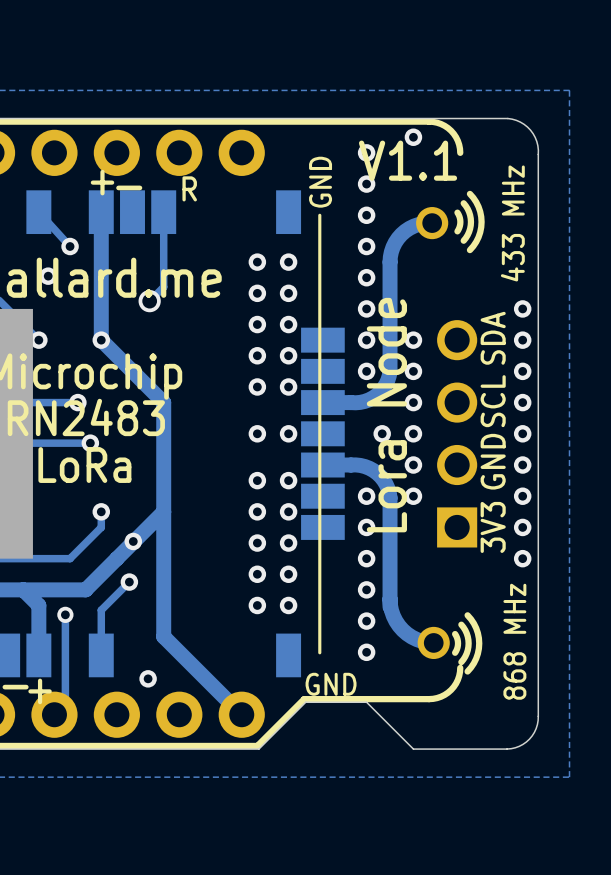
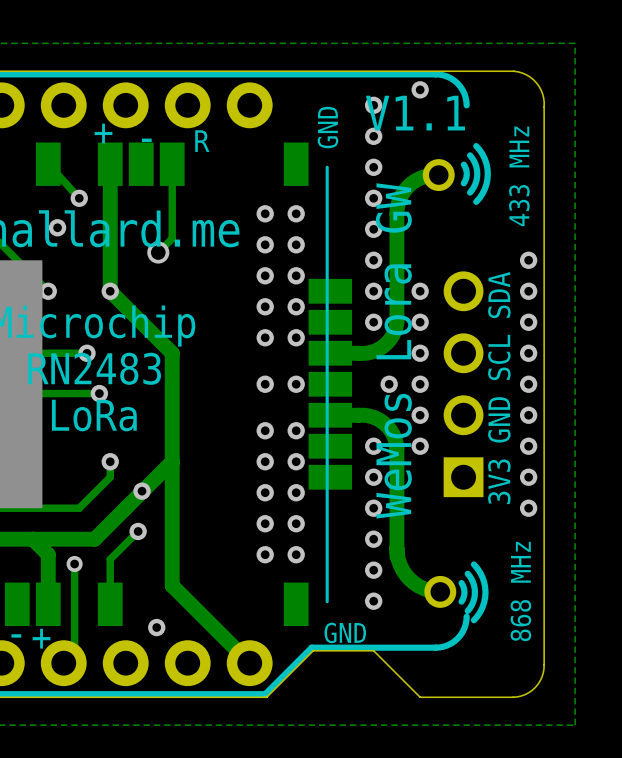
text: Lora Node (386, 415) -> WeMos Lora GW (393, 350)

